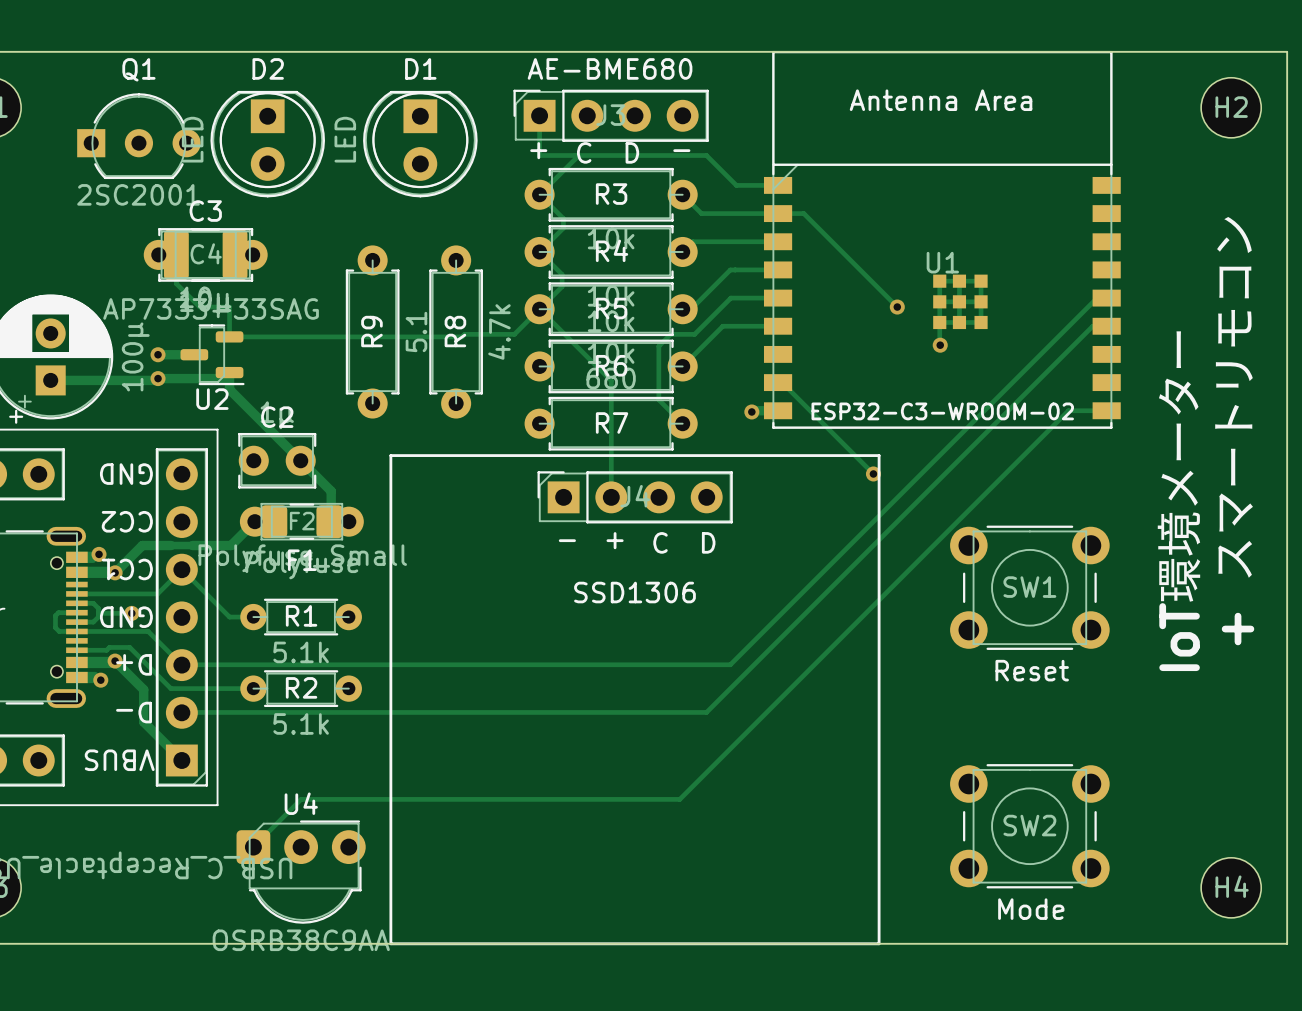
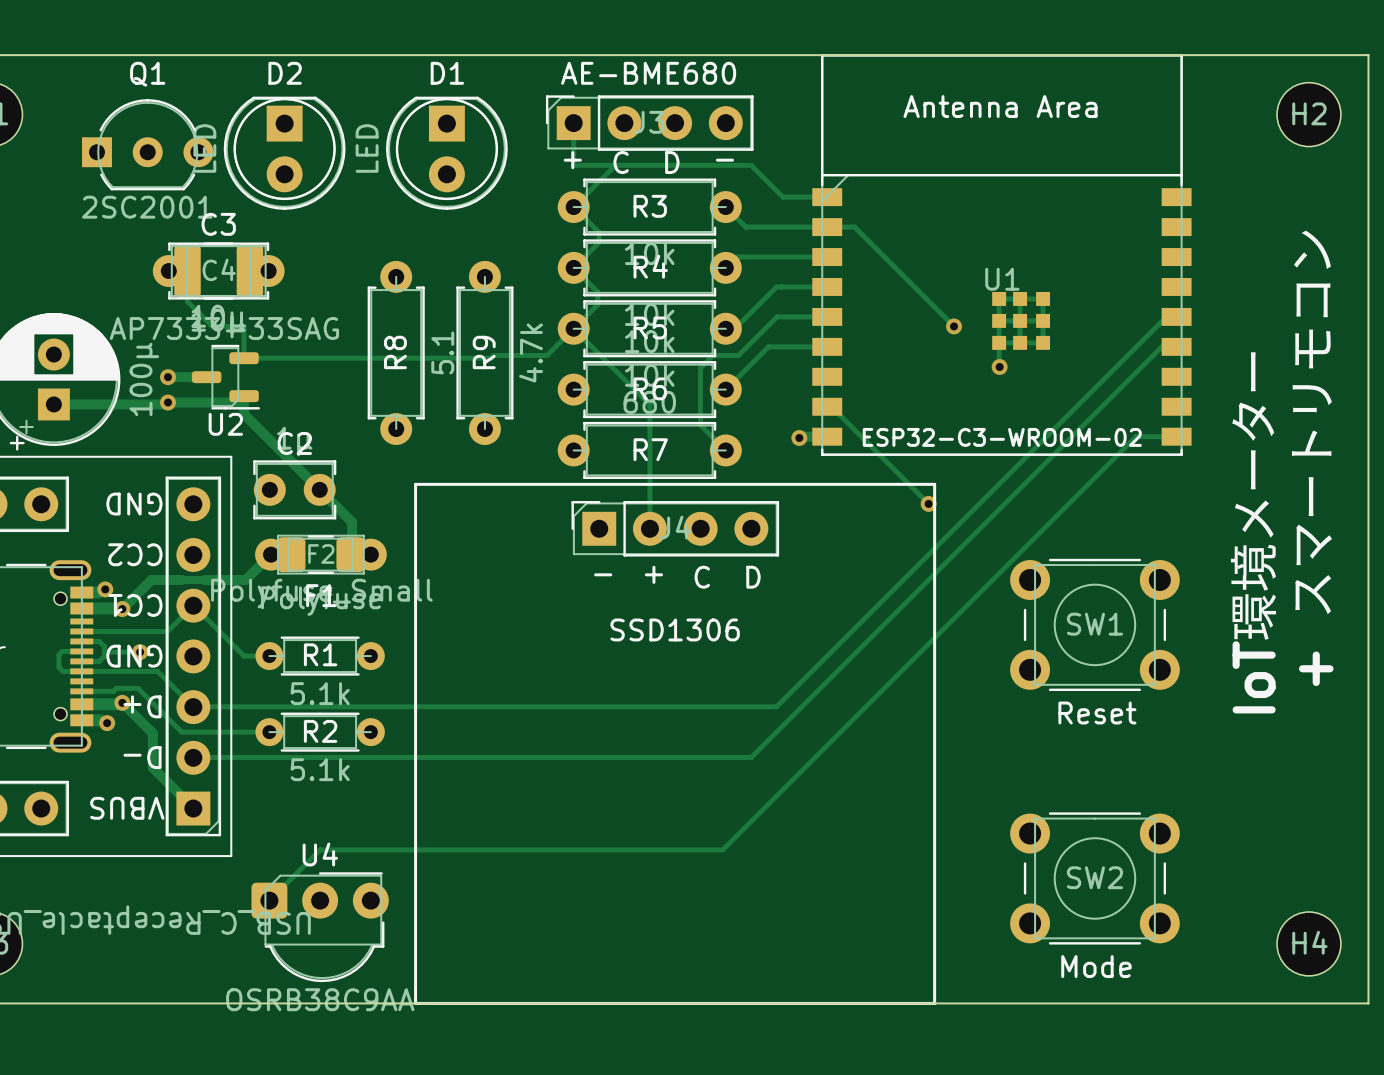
R9 name: R9 (371, 331) -> R8 (395, 352)
R8 name: R8 (455, 331) -> R9 (484, 352)

